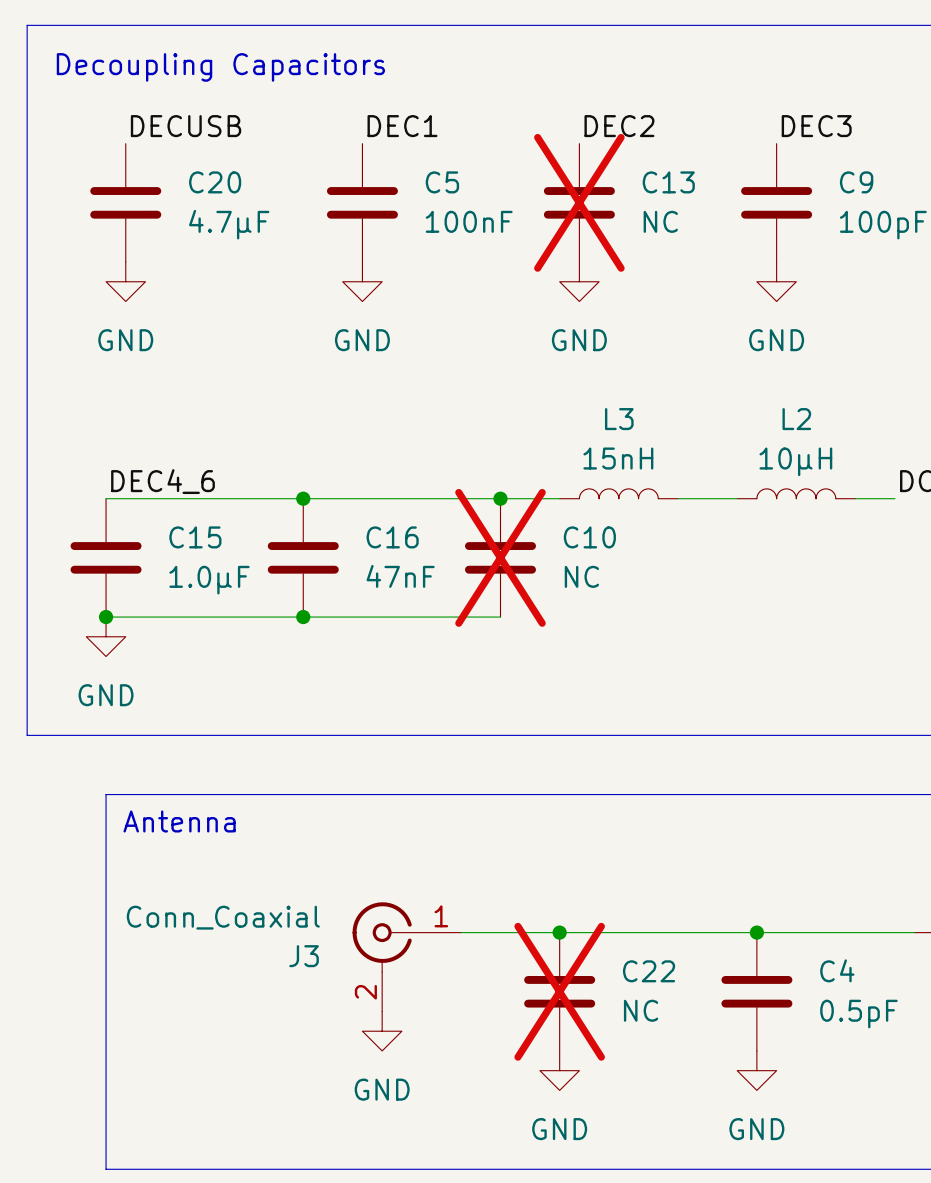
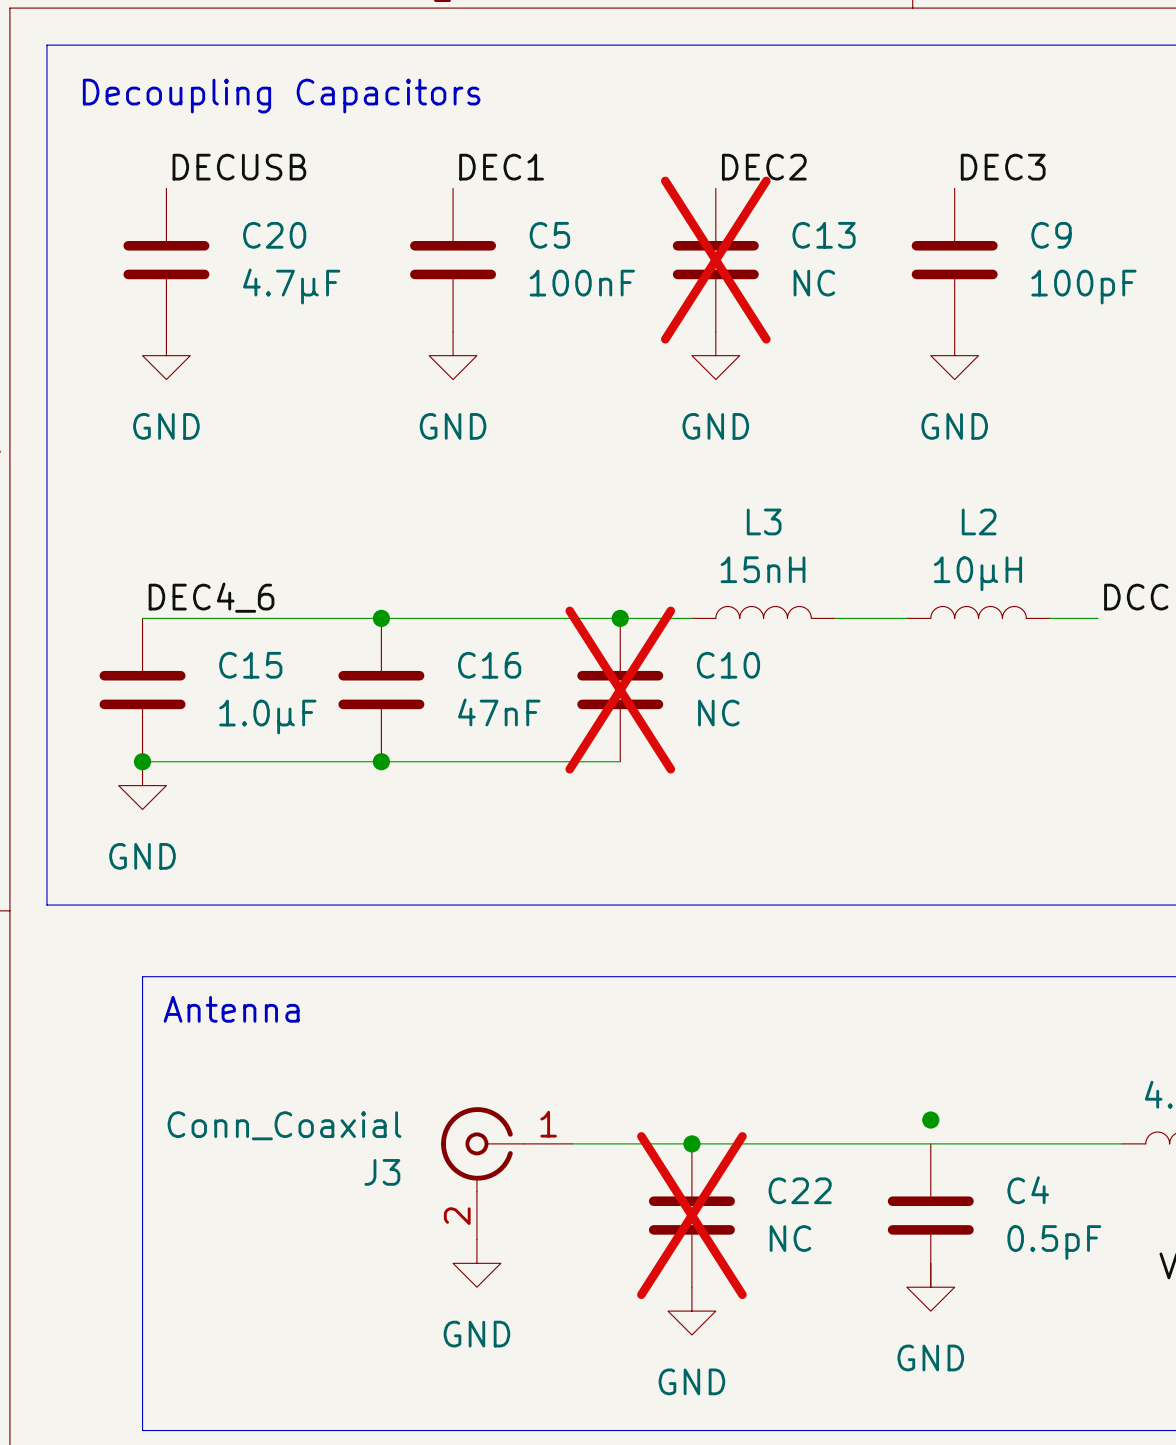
junction position: (756, 932) -> (930, 1120)
power symbol position: GND (756, 1070) -> GND (930, 1287)

